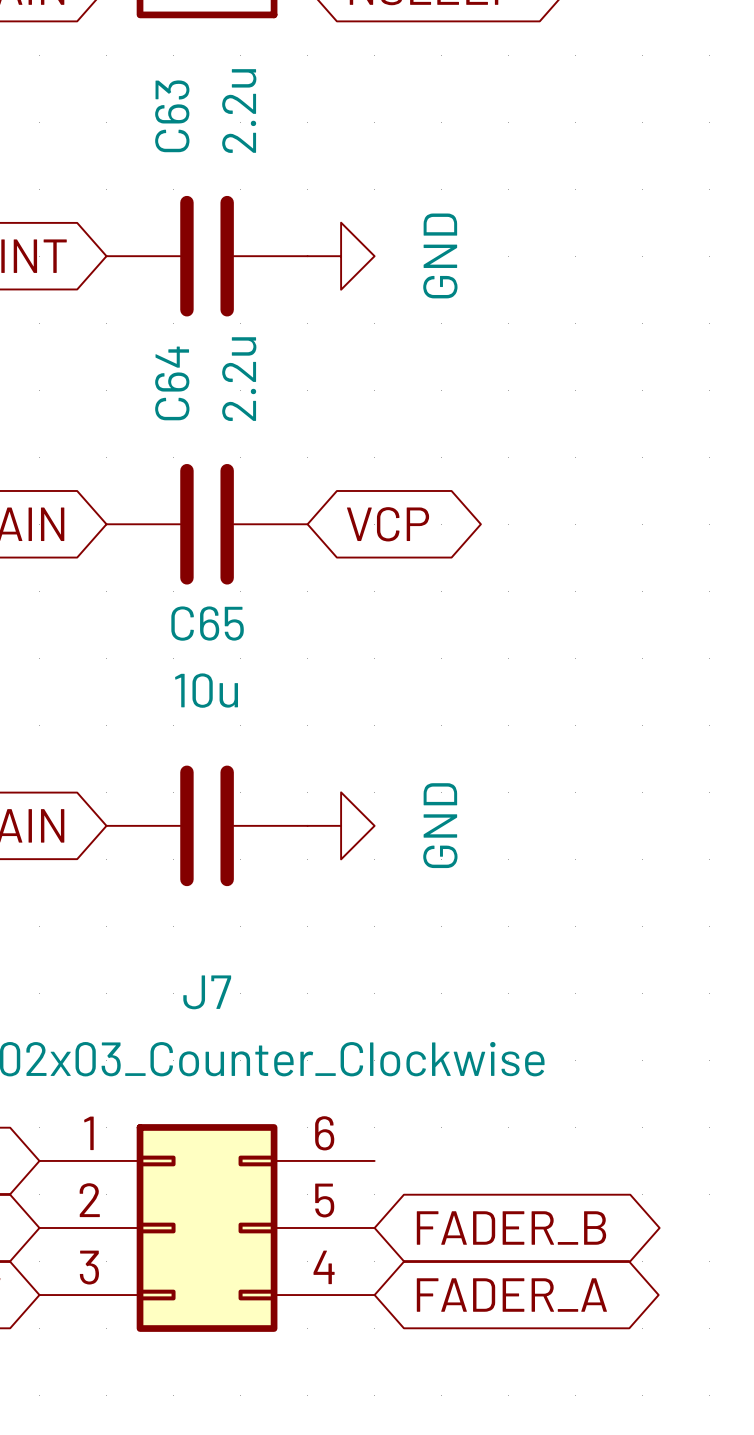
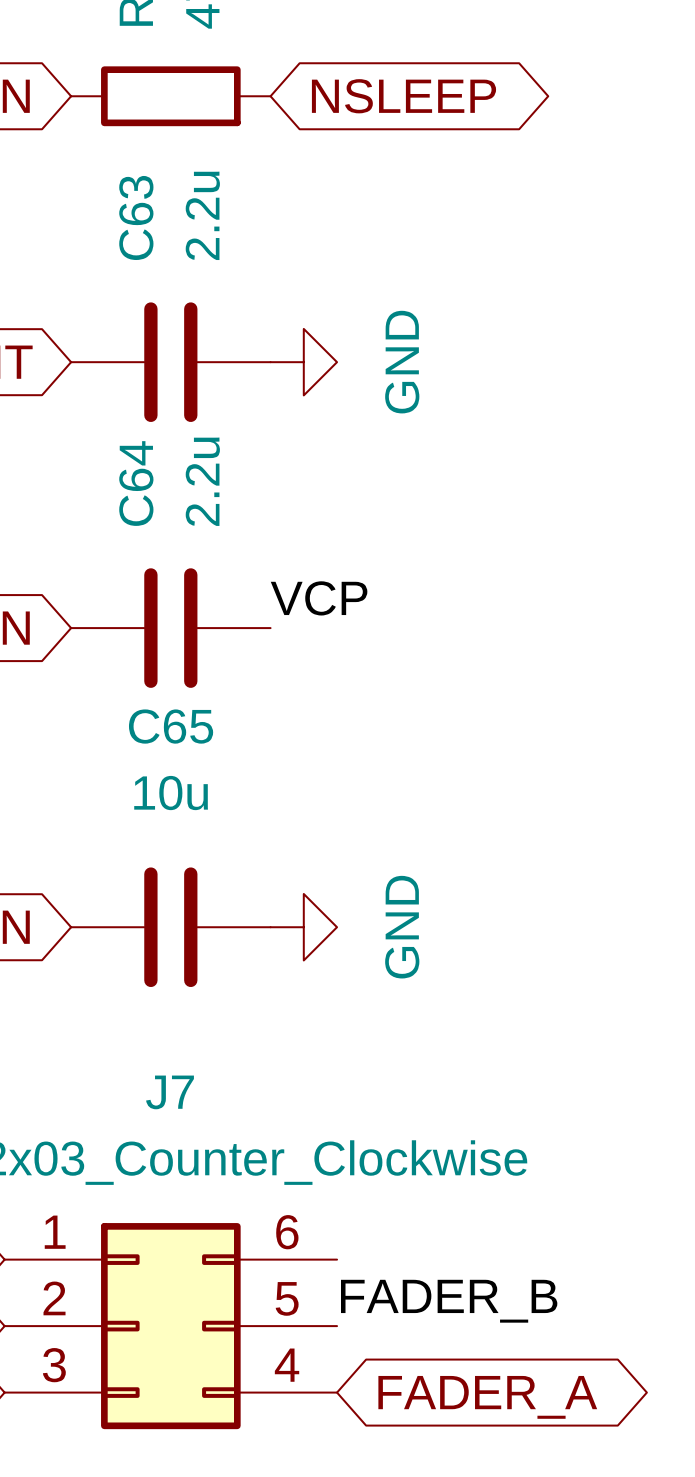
label: none -> VCP (319, 598)
global label: VCP (388, 524) -> none
label: none -> FADER_B (449, 1301)
global label: FADER_B (511, 1228) -> none

